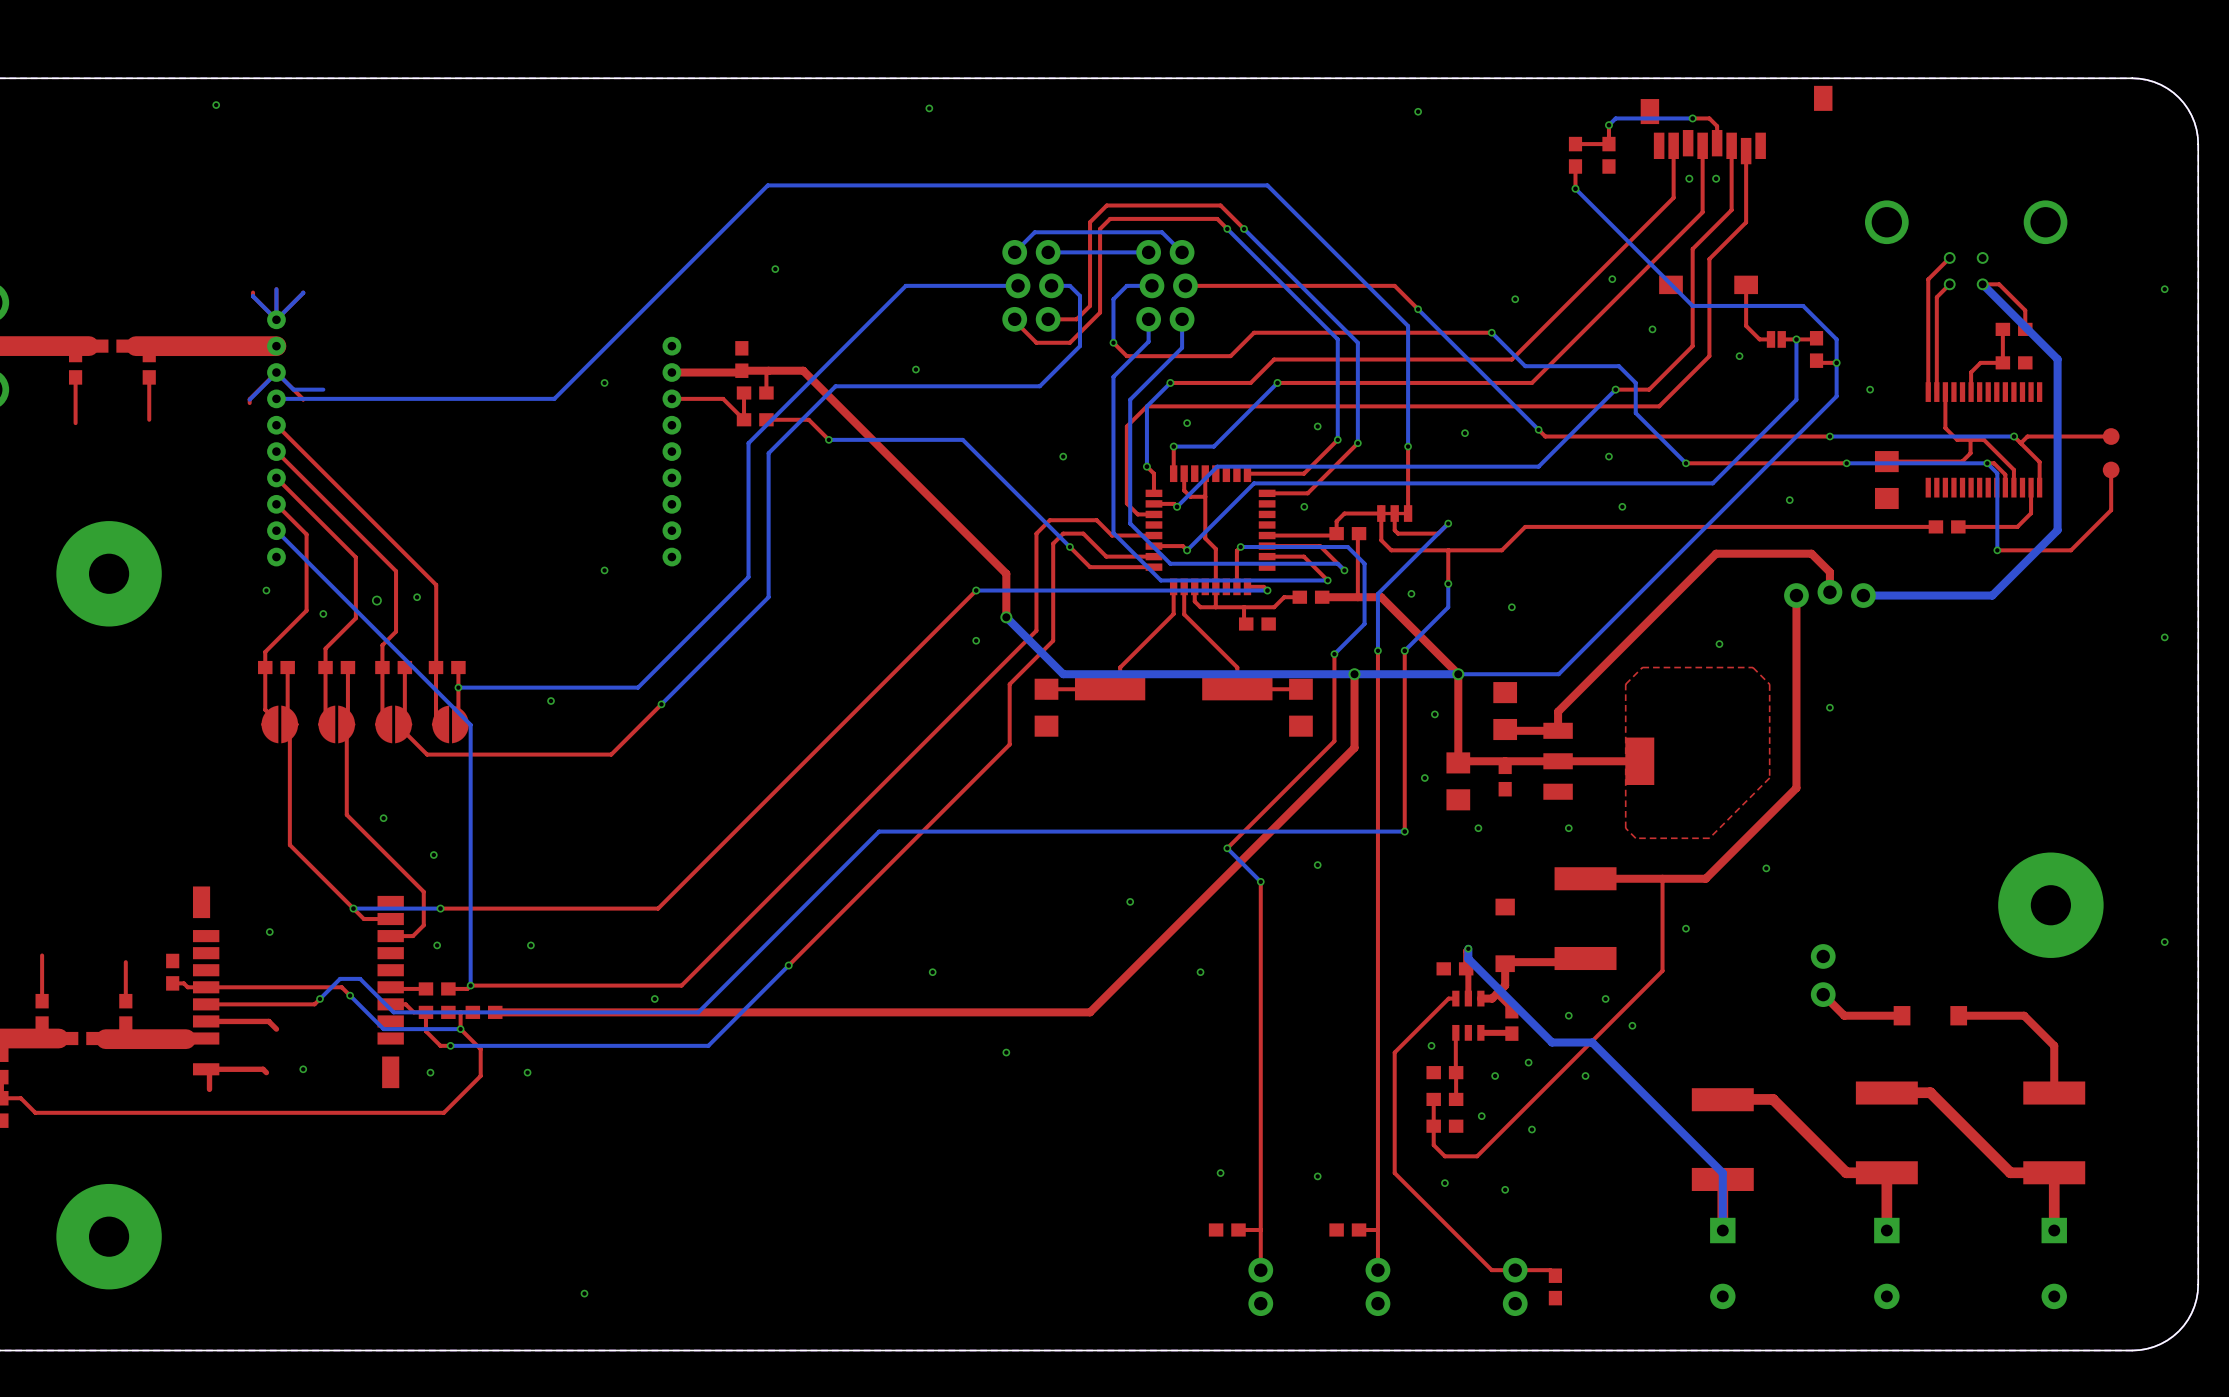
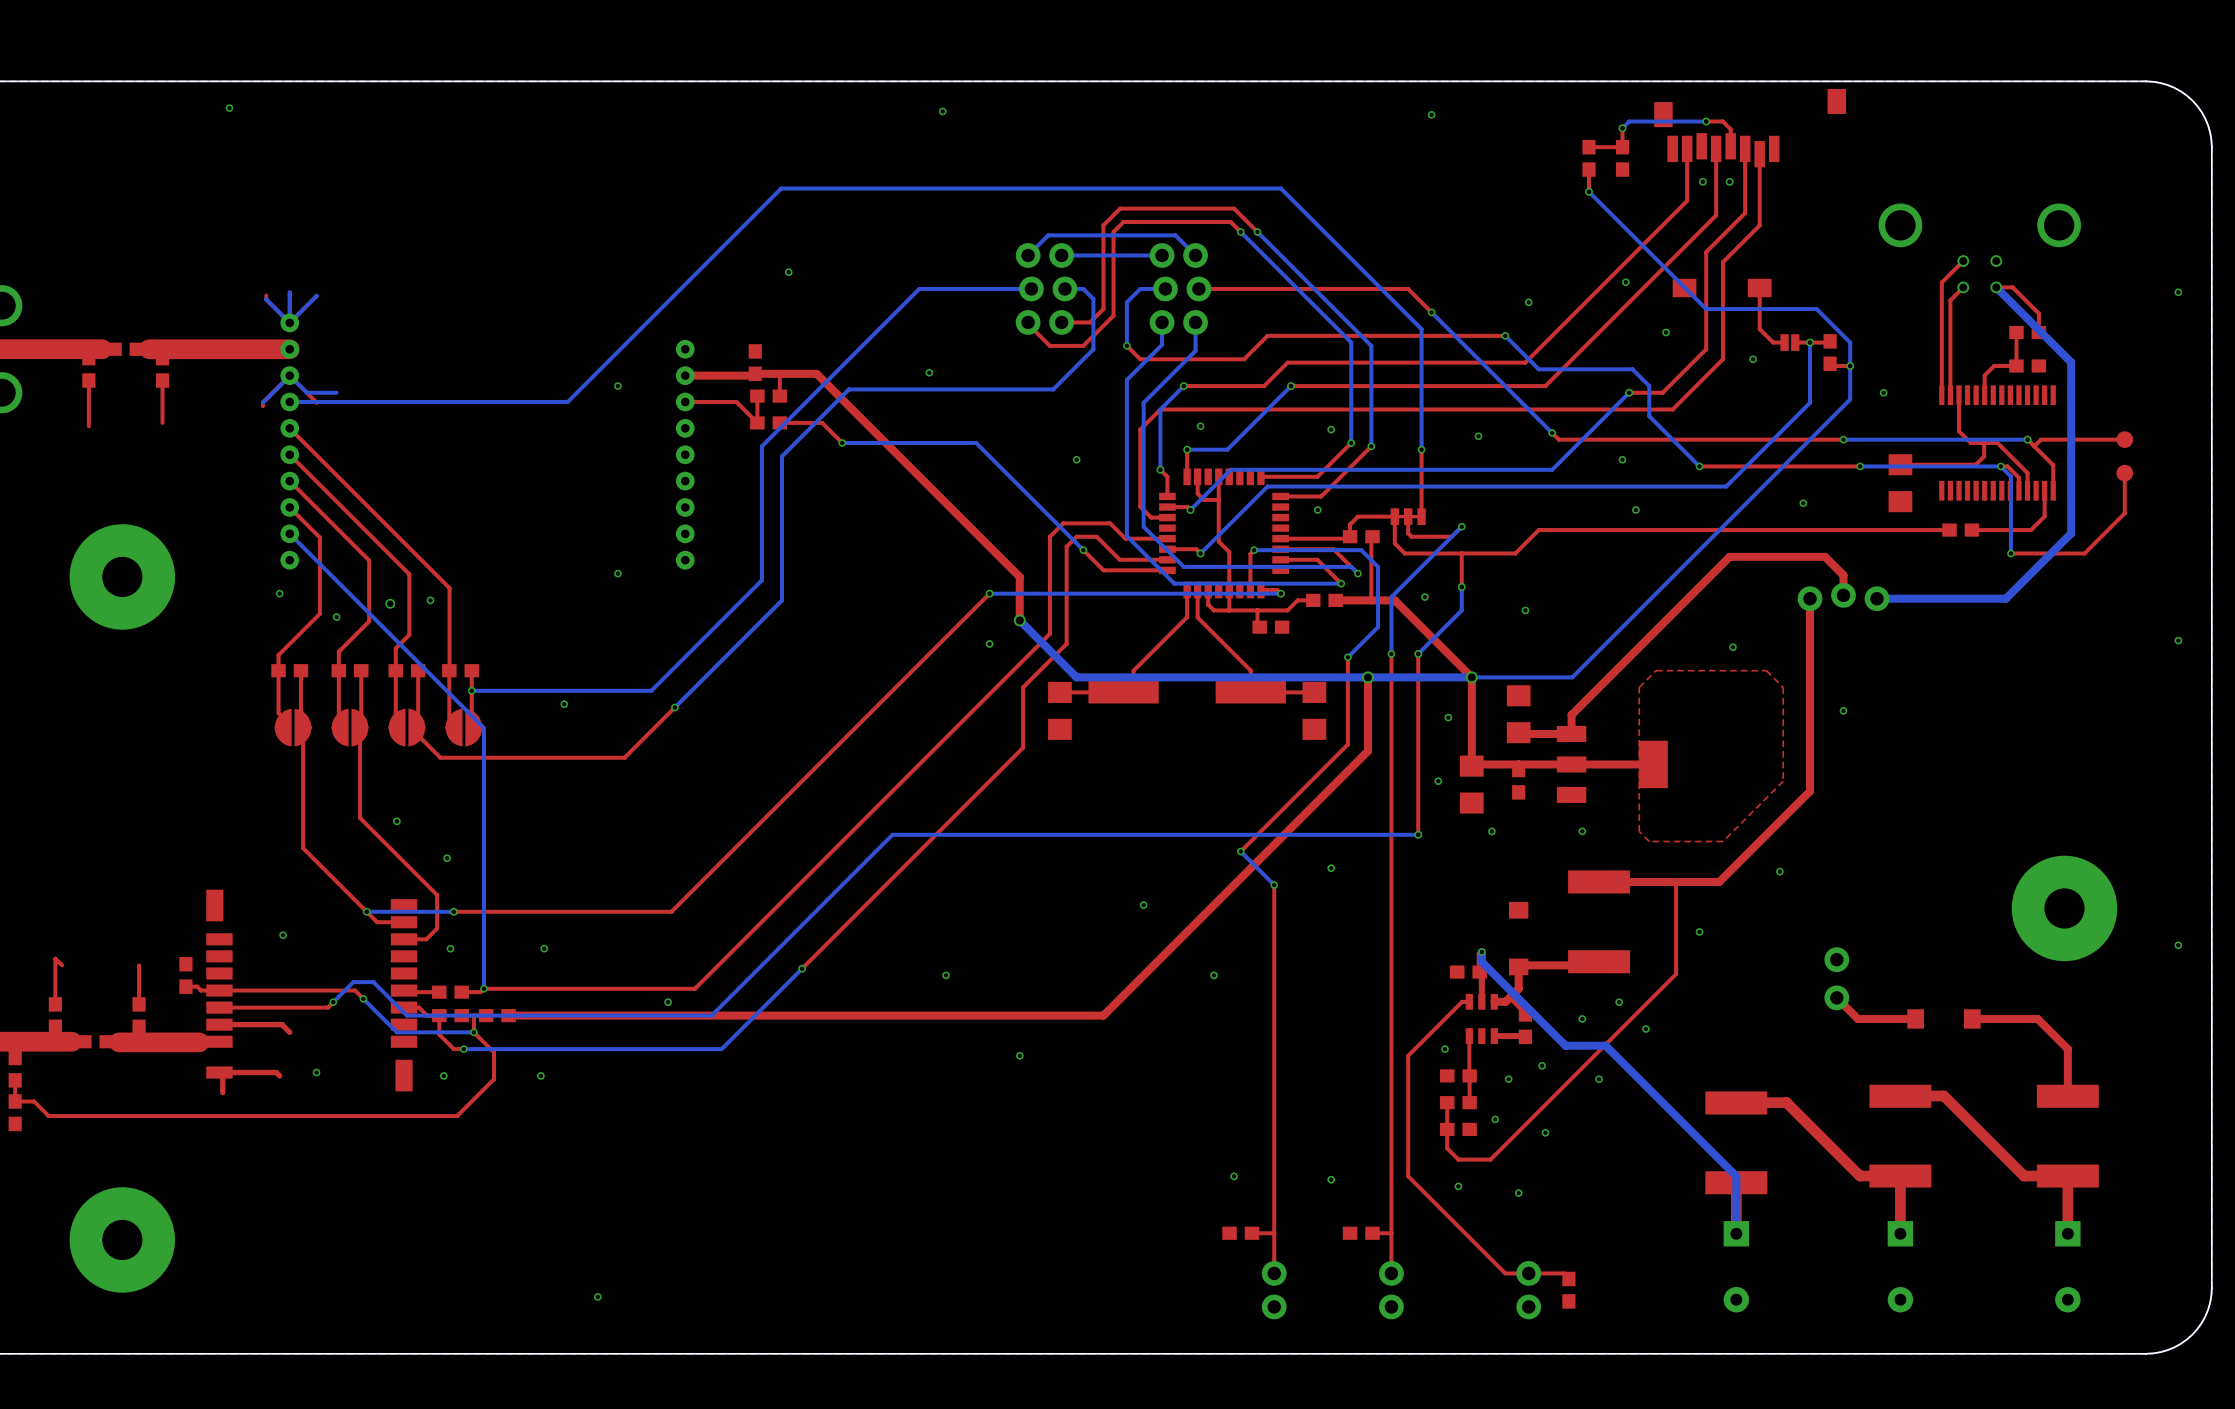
top track: none -> (55, 958) (62, 965)

